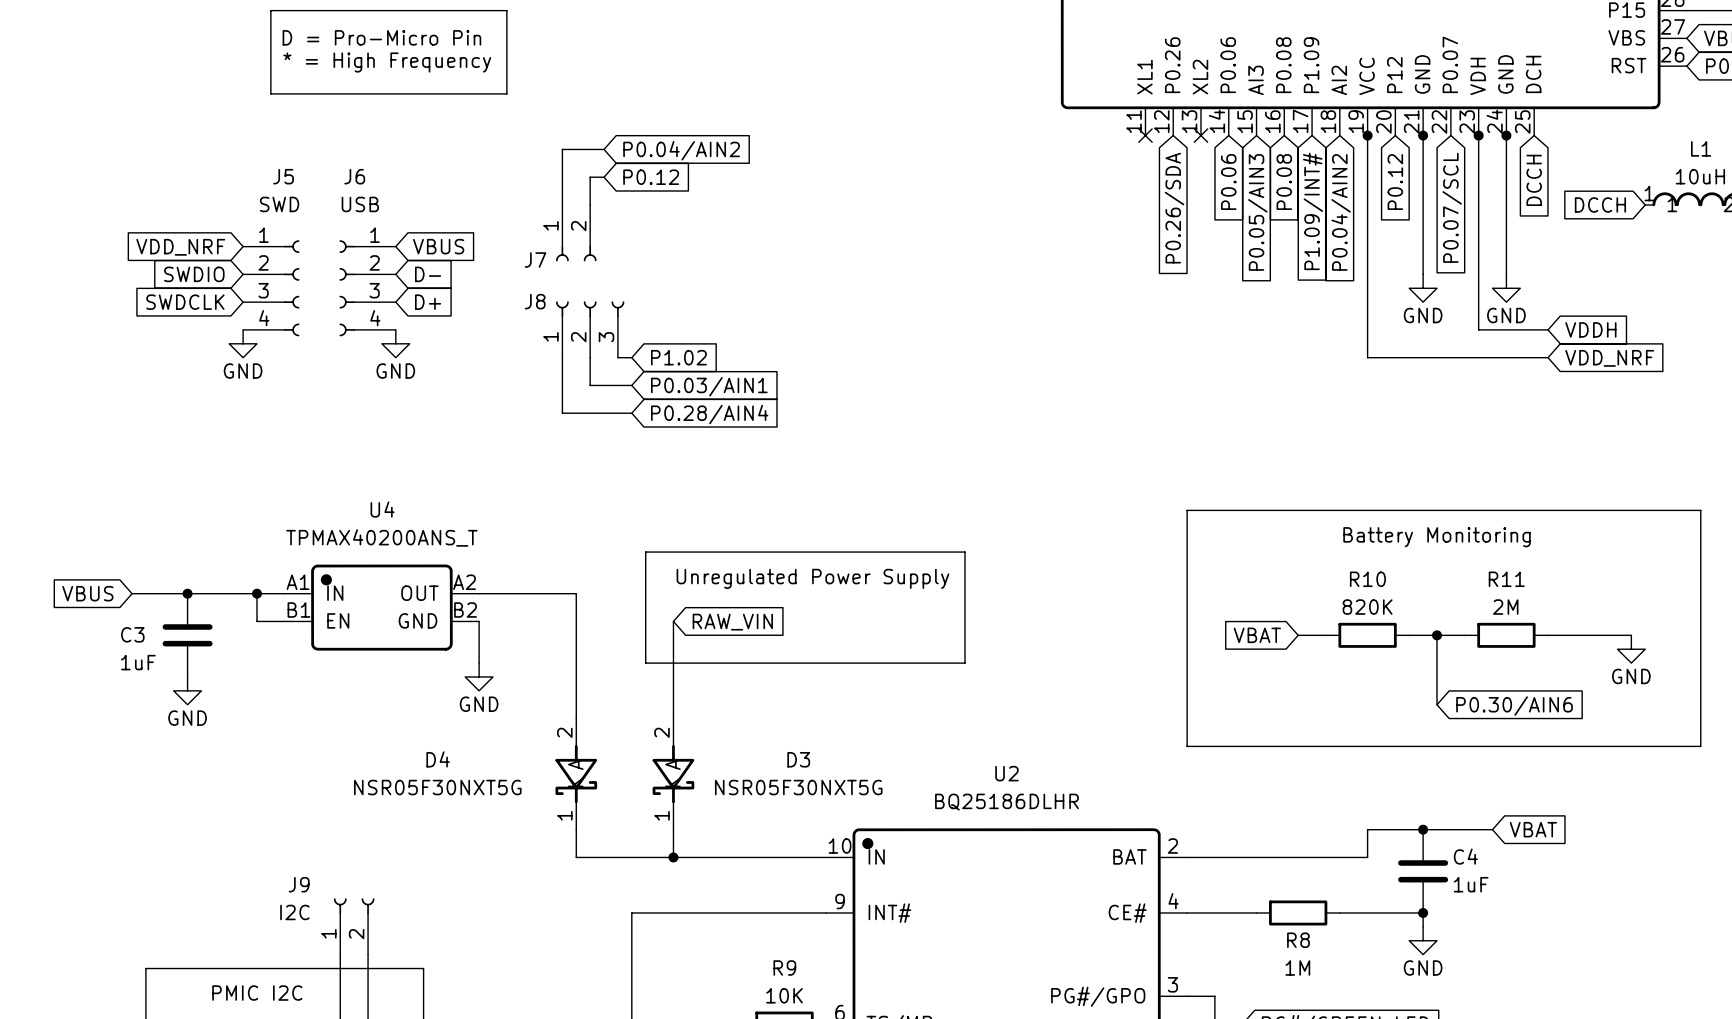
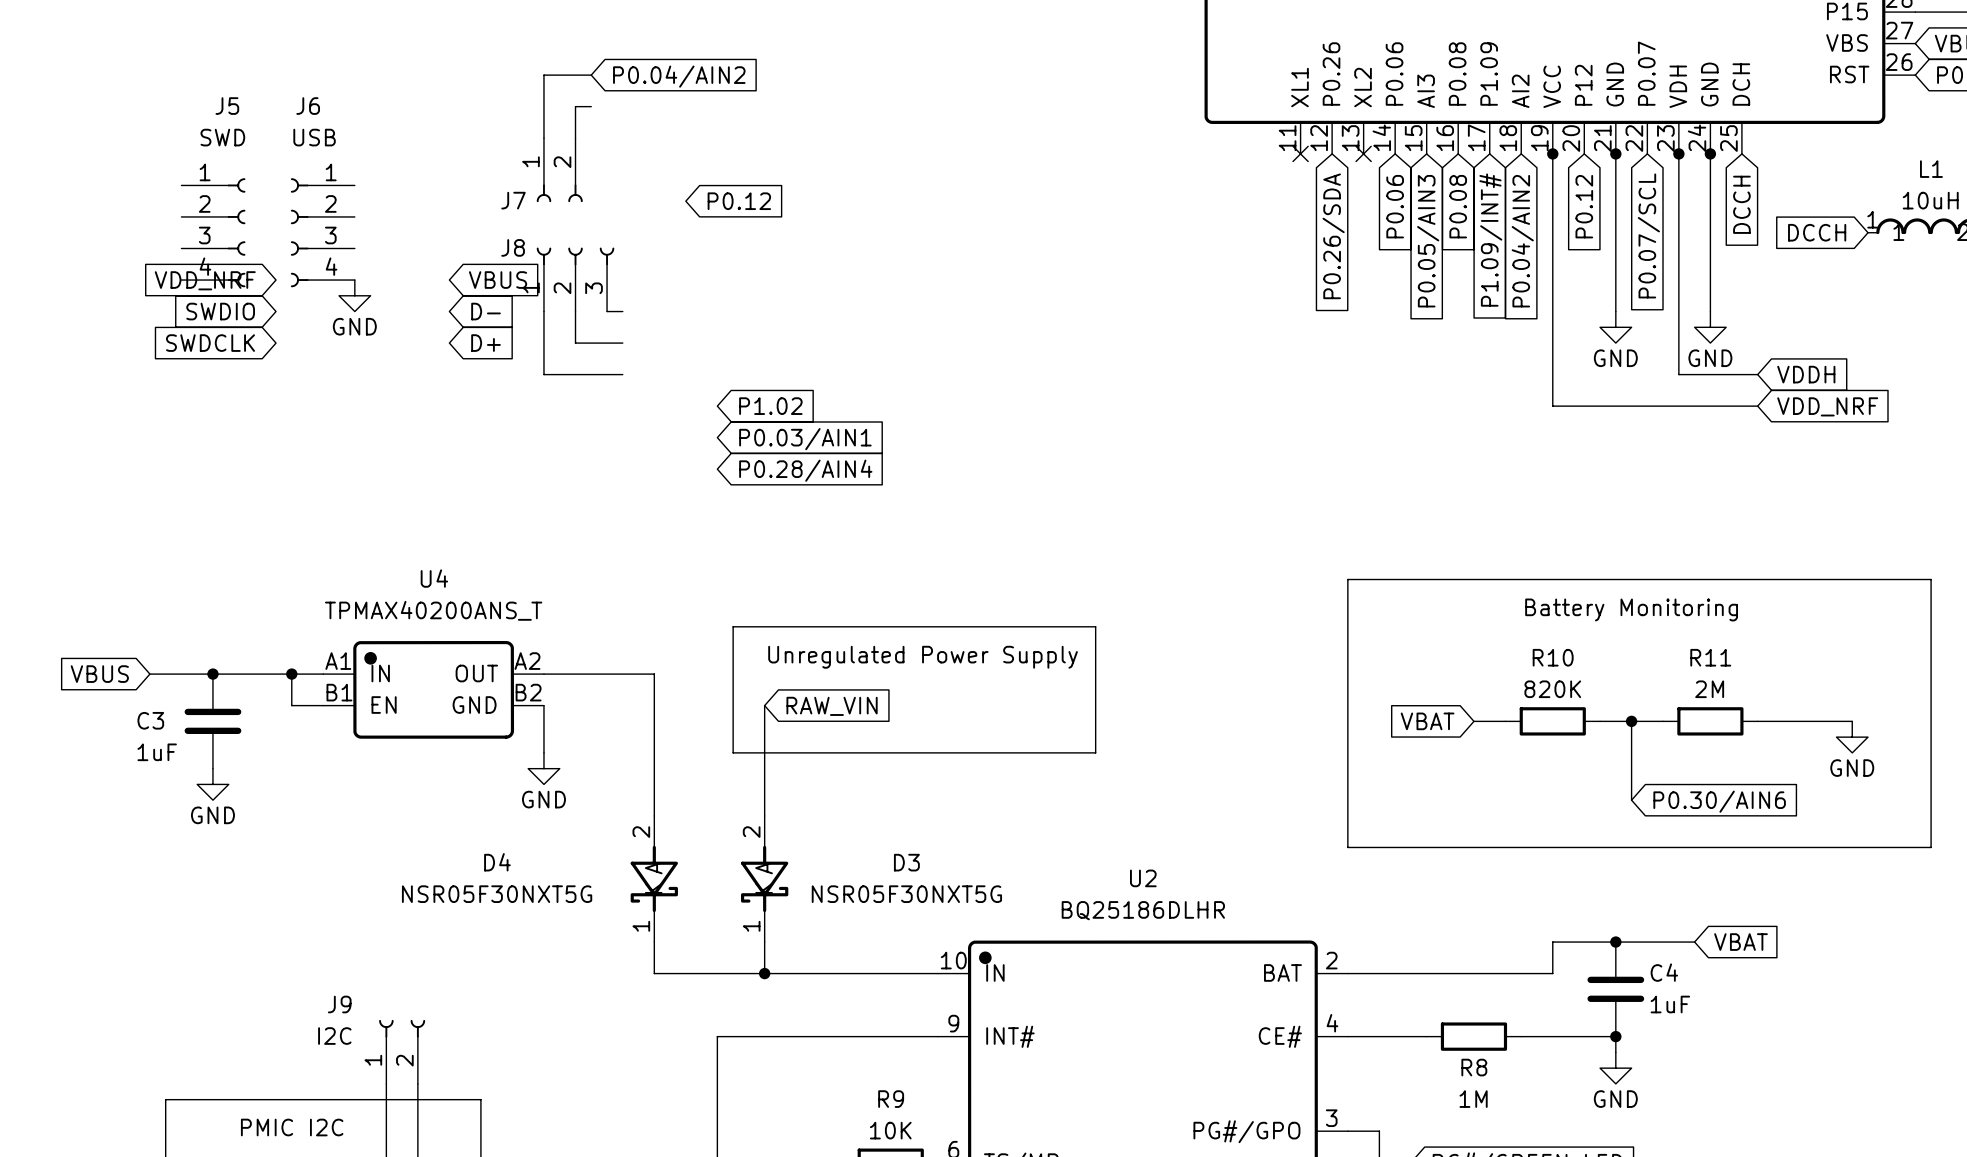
line: (270, 10) (506, 10) (506, 93) (270, 93) (270, 10) -> none
text: D = Pro-Micro Pin (381, 37) -> none
text: * = High Frequency (387, 62) -> none
wire: (604, 149) (562, 149) (562, 204) -> (591, 75) (543, 75) (543, 138)
global label position: P0.04/AIN2 (681, 150) -> P0.04/AIN2 (679, 76)
wire: (604, 177) (590, 177) (590, 204) -> (591, 106) (575, 106) (575, 138)
J7 position: (576, 233) -> (559, 170)
power symbol: none -> GND (354, 295)
J5 position: (271, 288) -> (213, 232)
J6 position: (367, 288) -> (322, 232)
J8 position: (590, 329) -> (575, 279)
power symbol: GND (243, 343) -> none
power symbol: GND (395, 343) -> none
wire: (562, 357) (562, 413) (631, 413) -> (543, 311) (543, 374) (622, 374)
wire: (590, 357) (590, 385) (631, 385) -> (575, 311) (575, 343) (622, 343)
wire: (617, 357) (631, 357) -> (607, 311) (622, 311)

